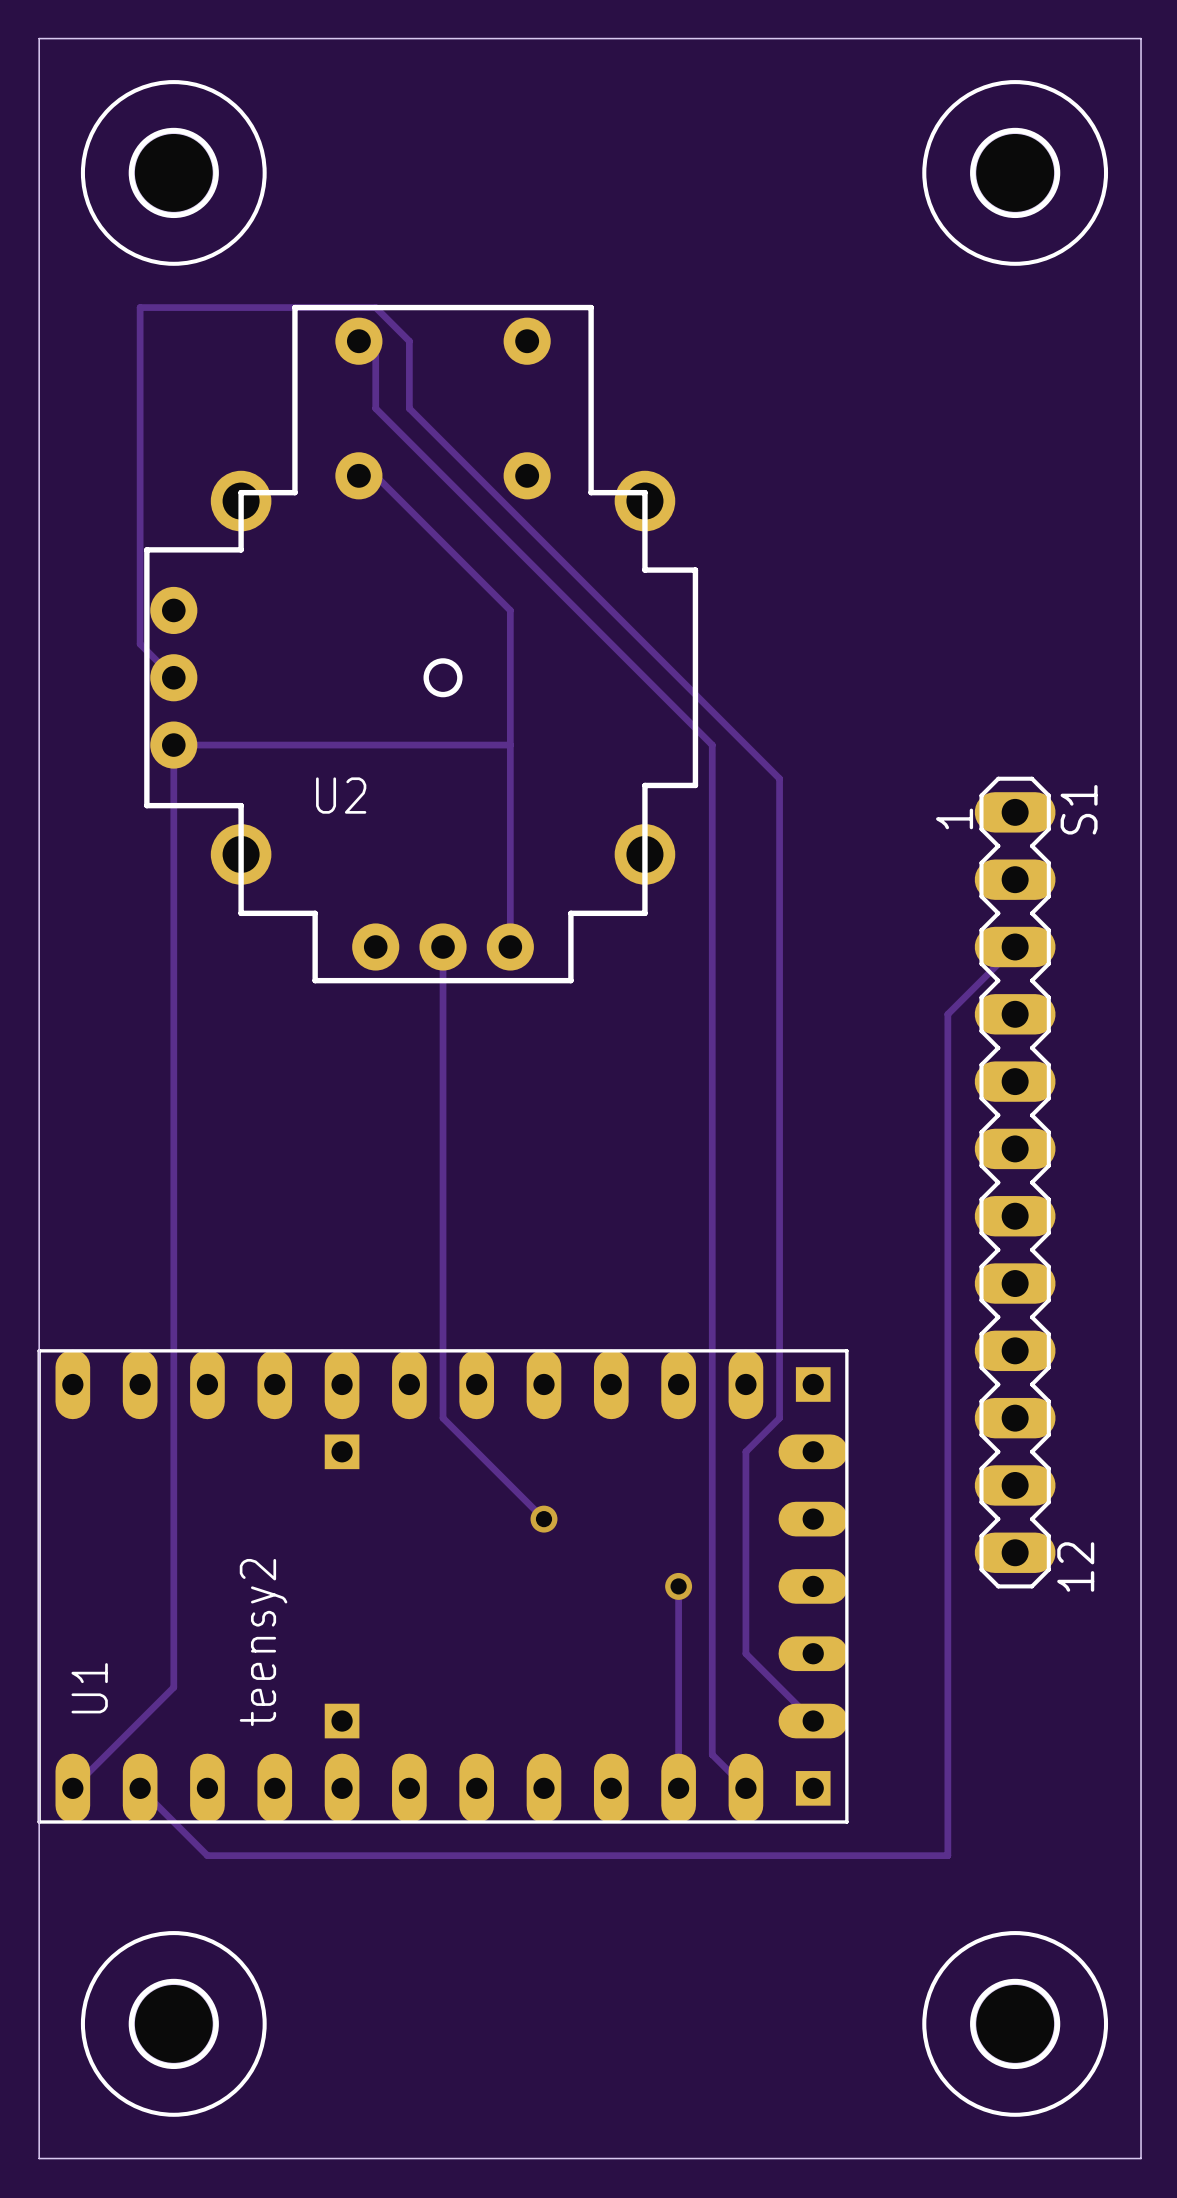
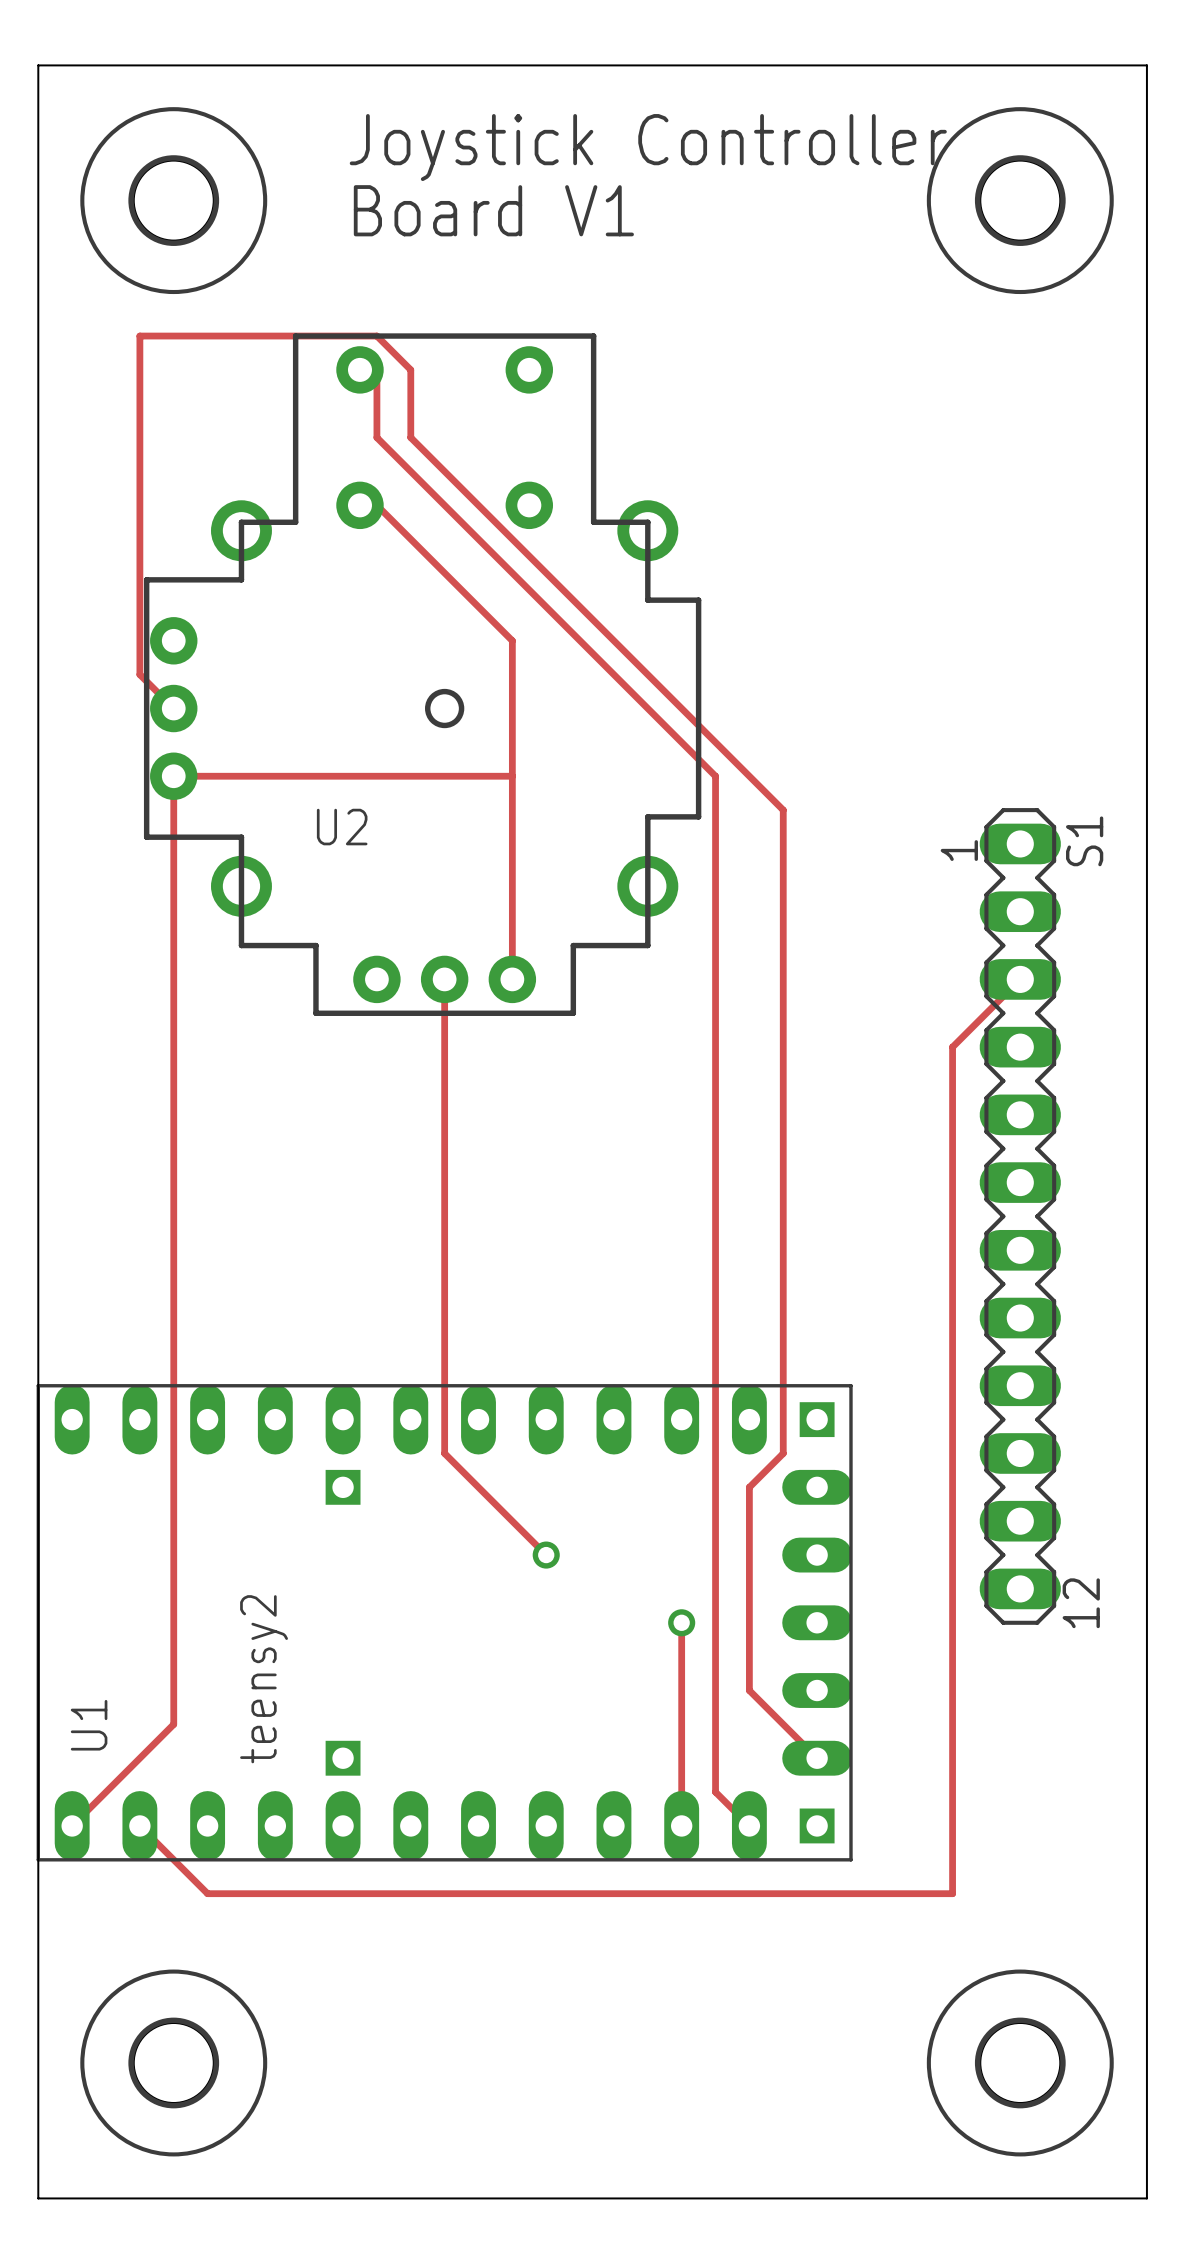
text: none -> Joystick Controller (648, 147)
text: none -> Board V1 (493, 210)

